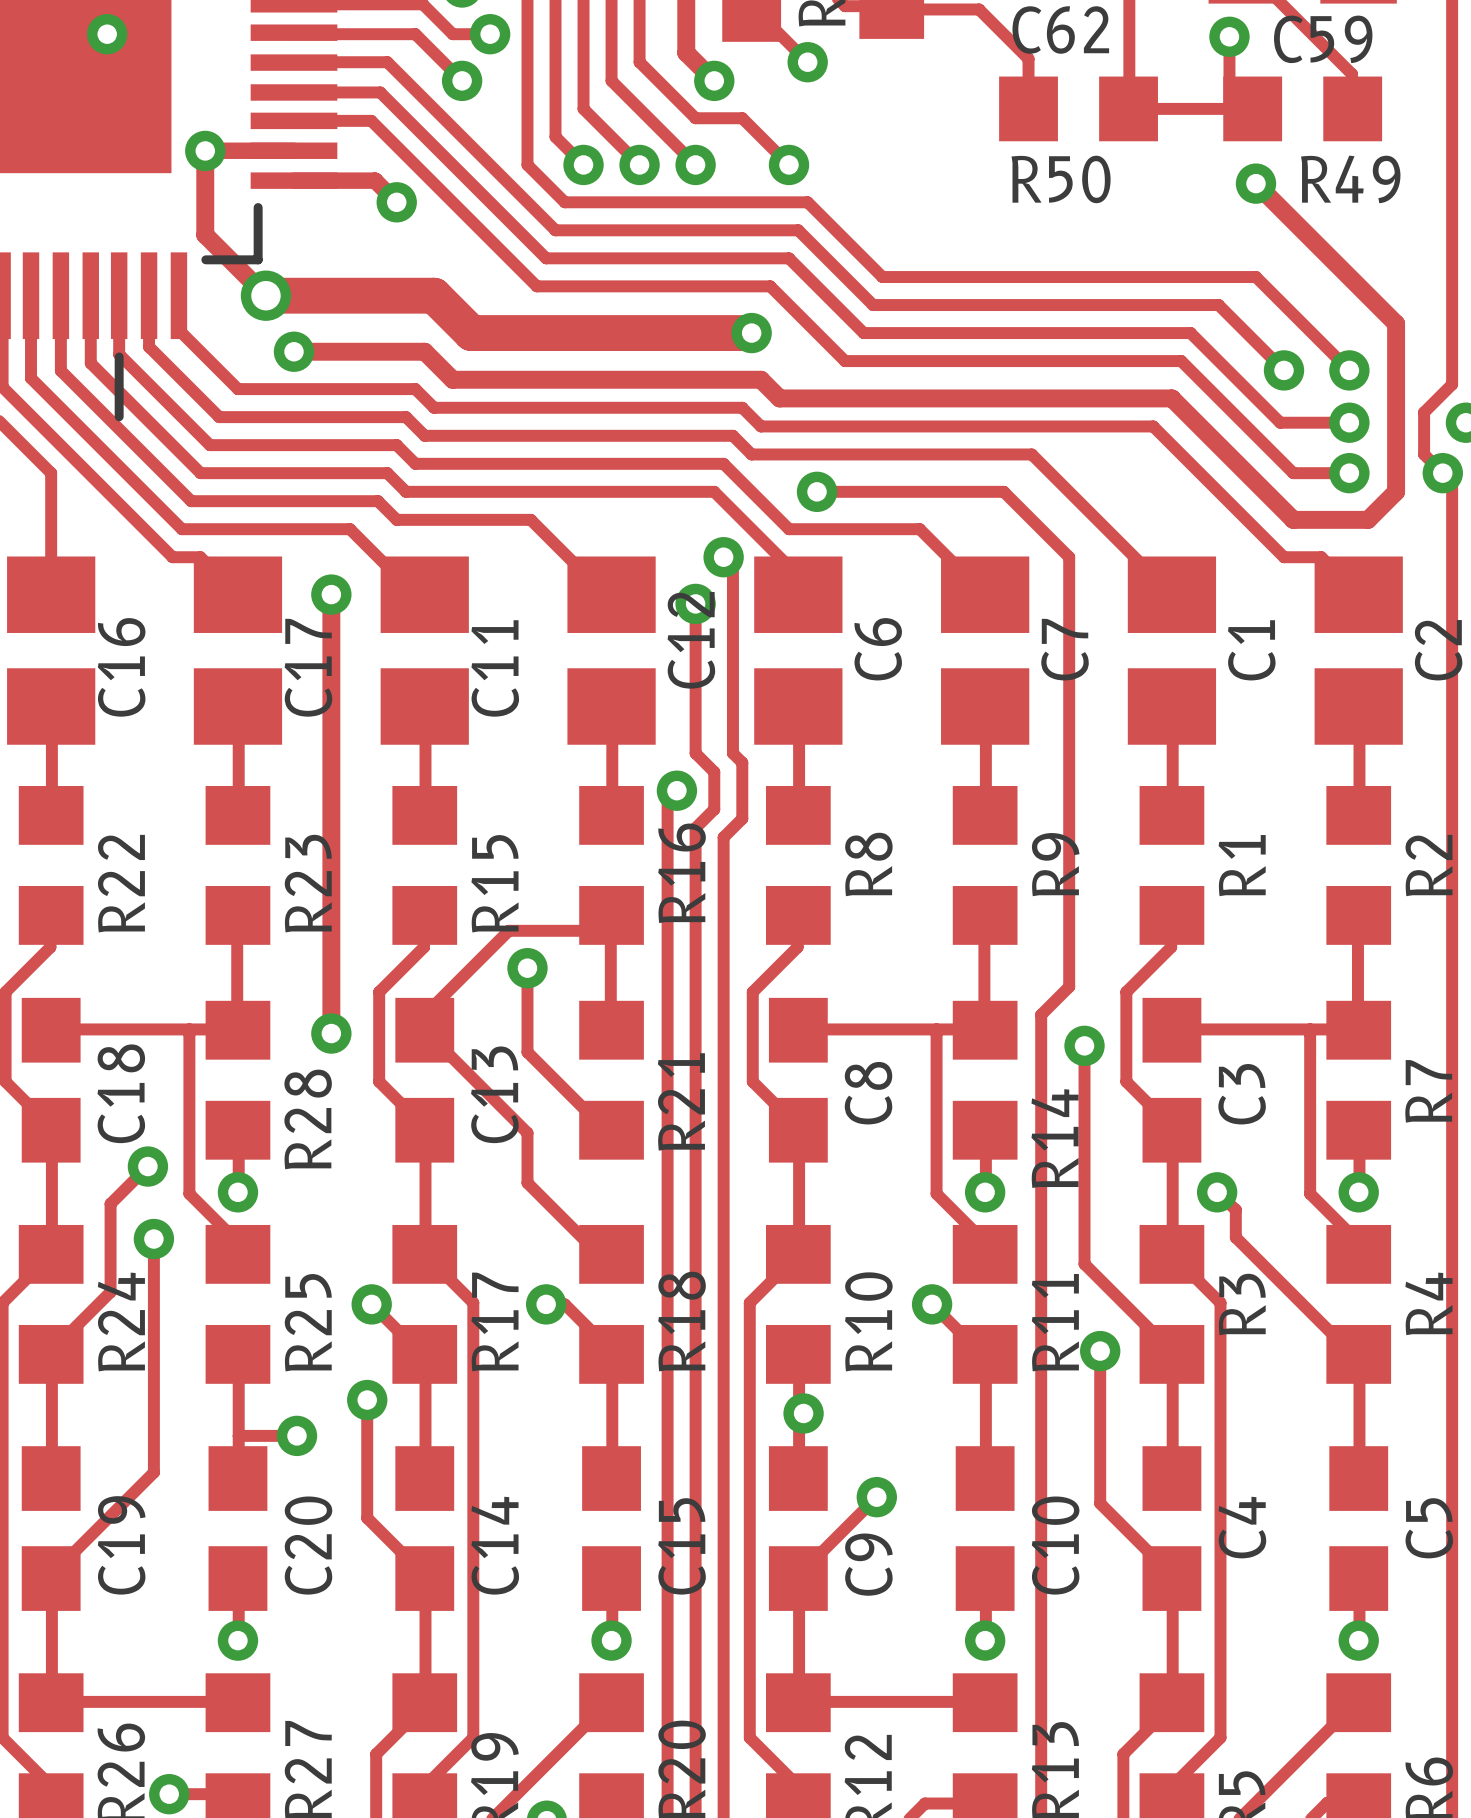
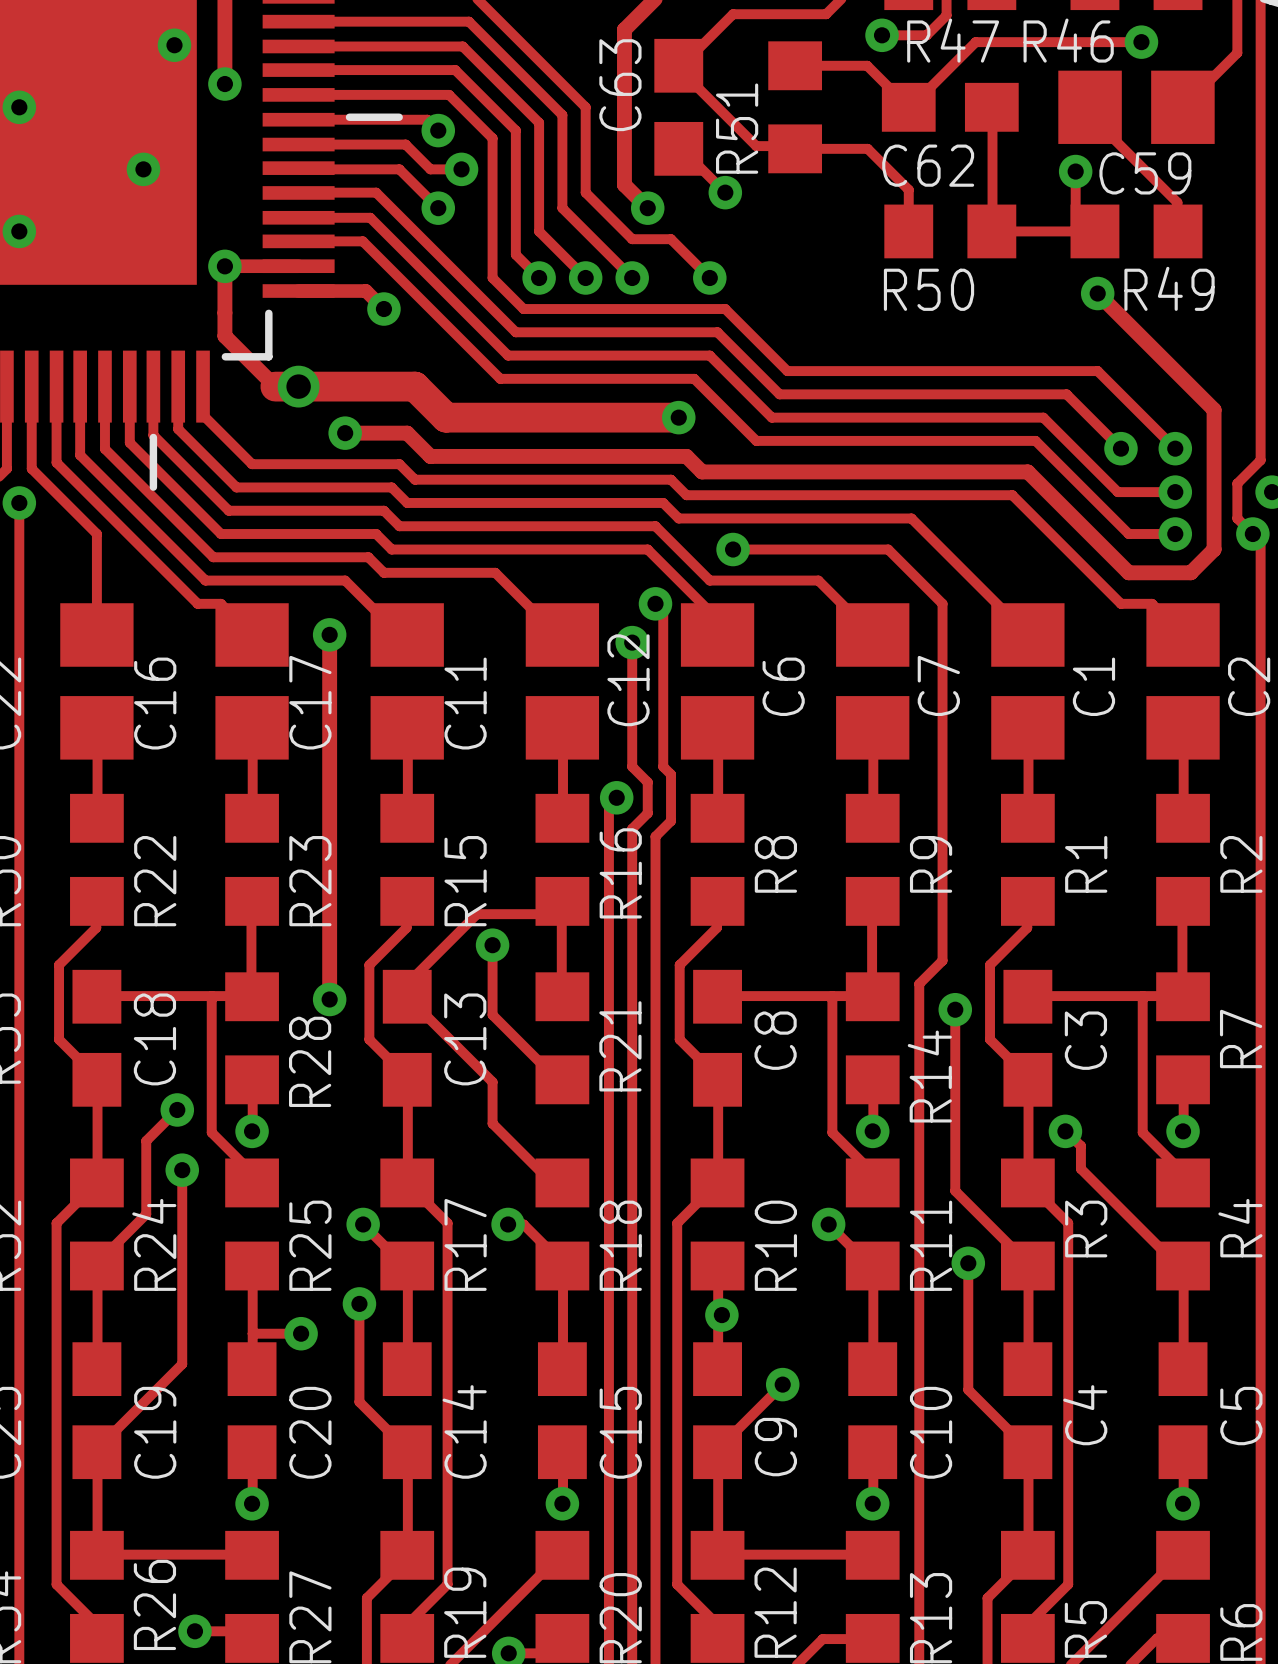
via position: (265, 295) -> (298, 386)
track: (294, 351) (350, 351) -> none
via position: (294, 351) -> (345, 433)

